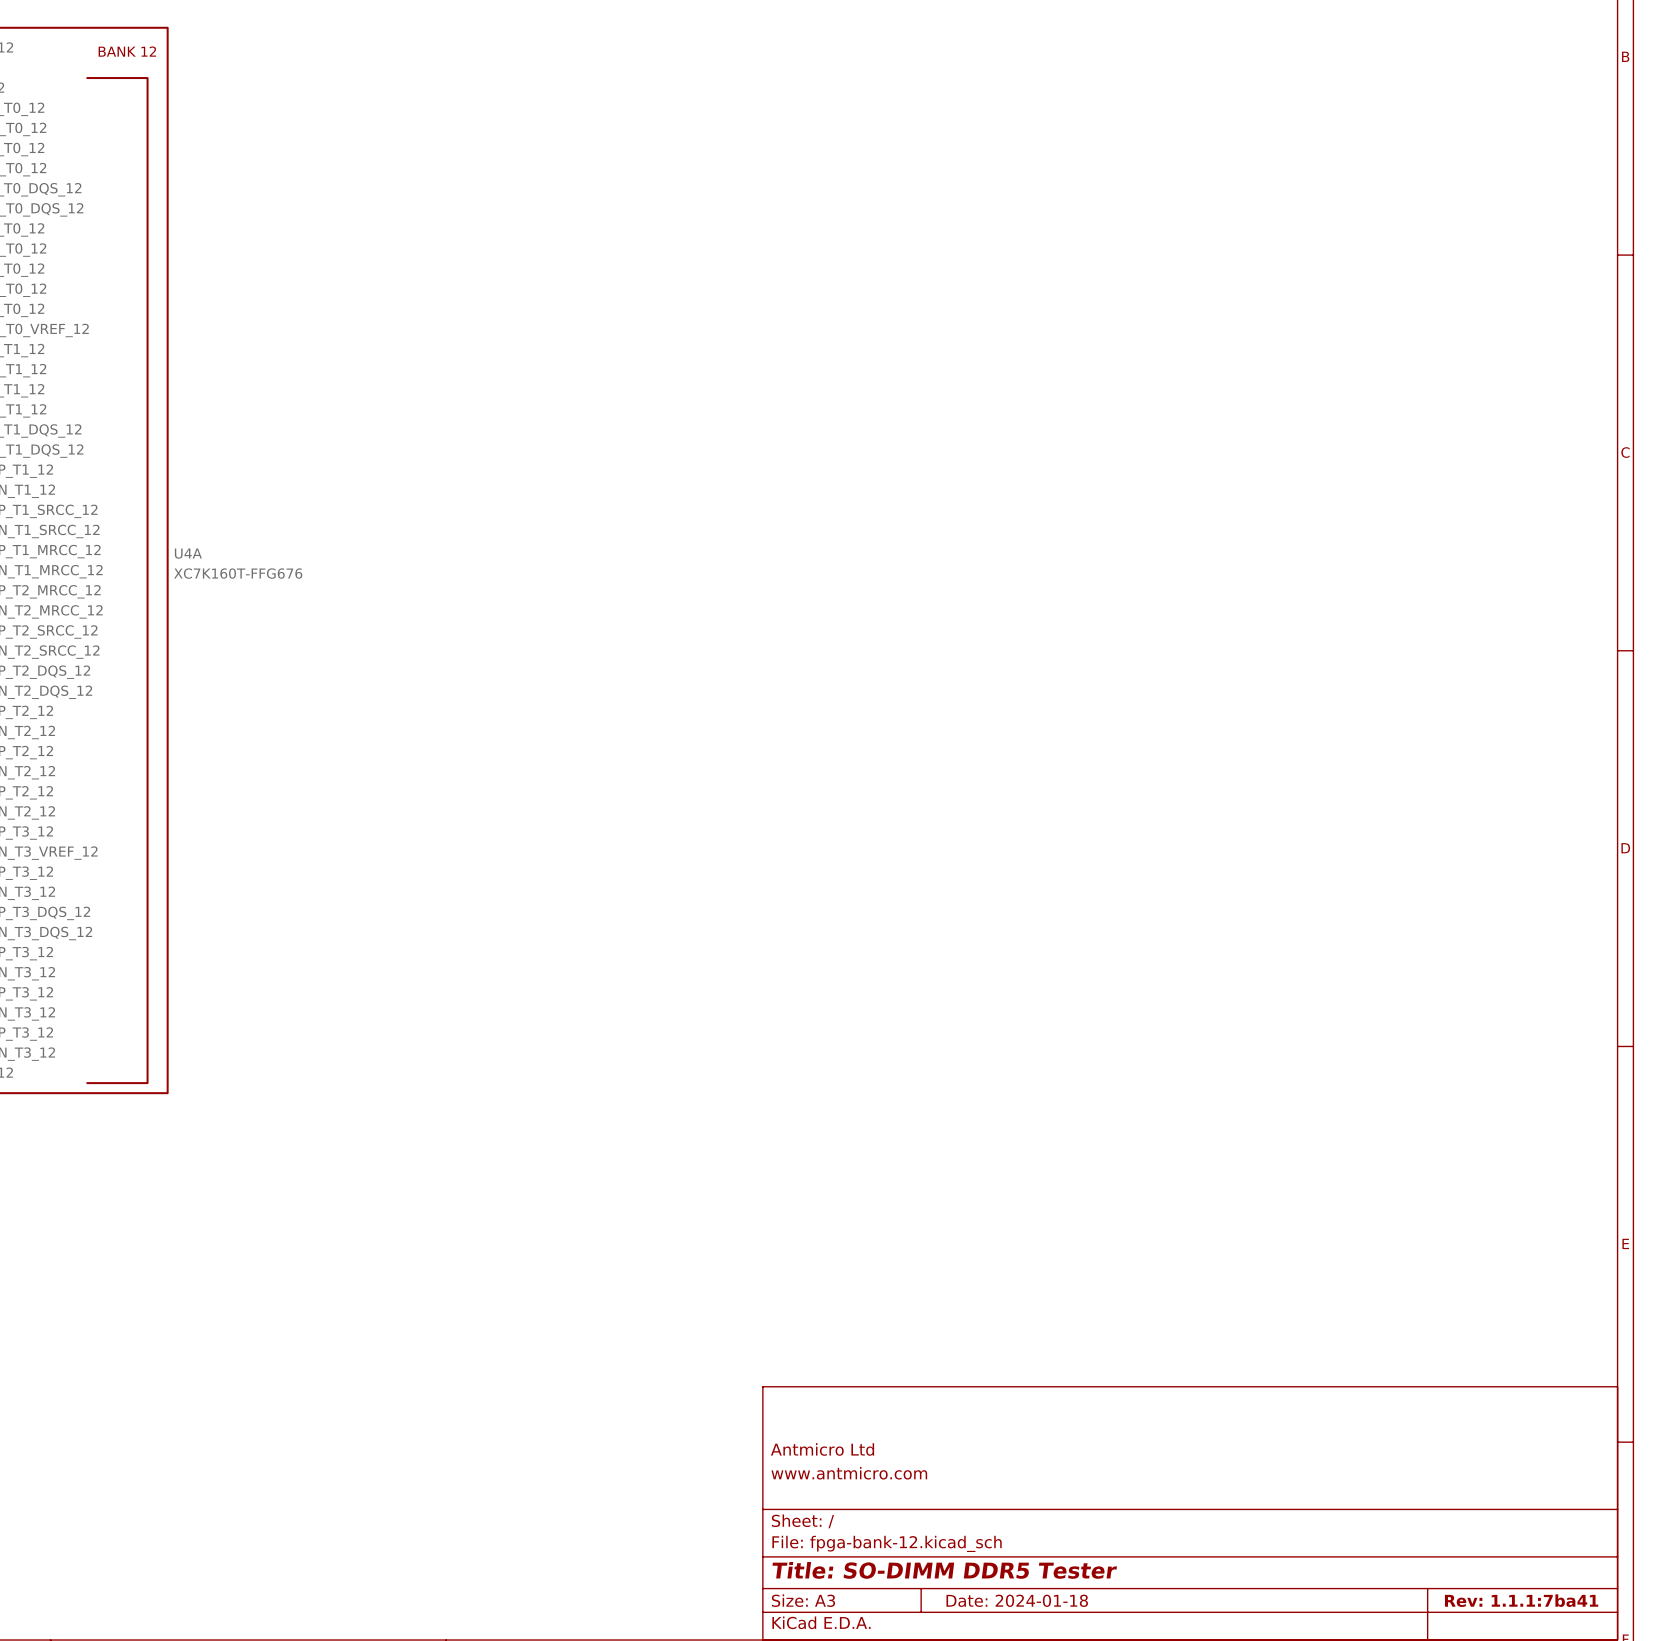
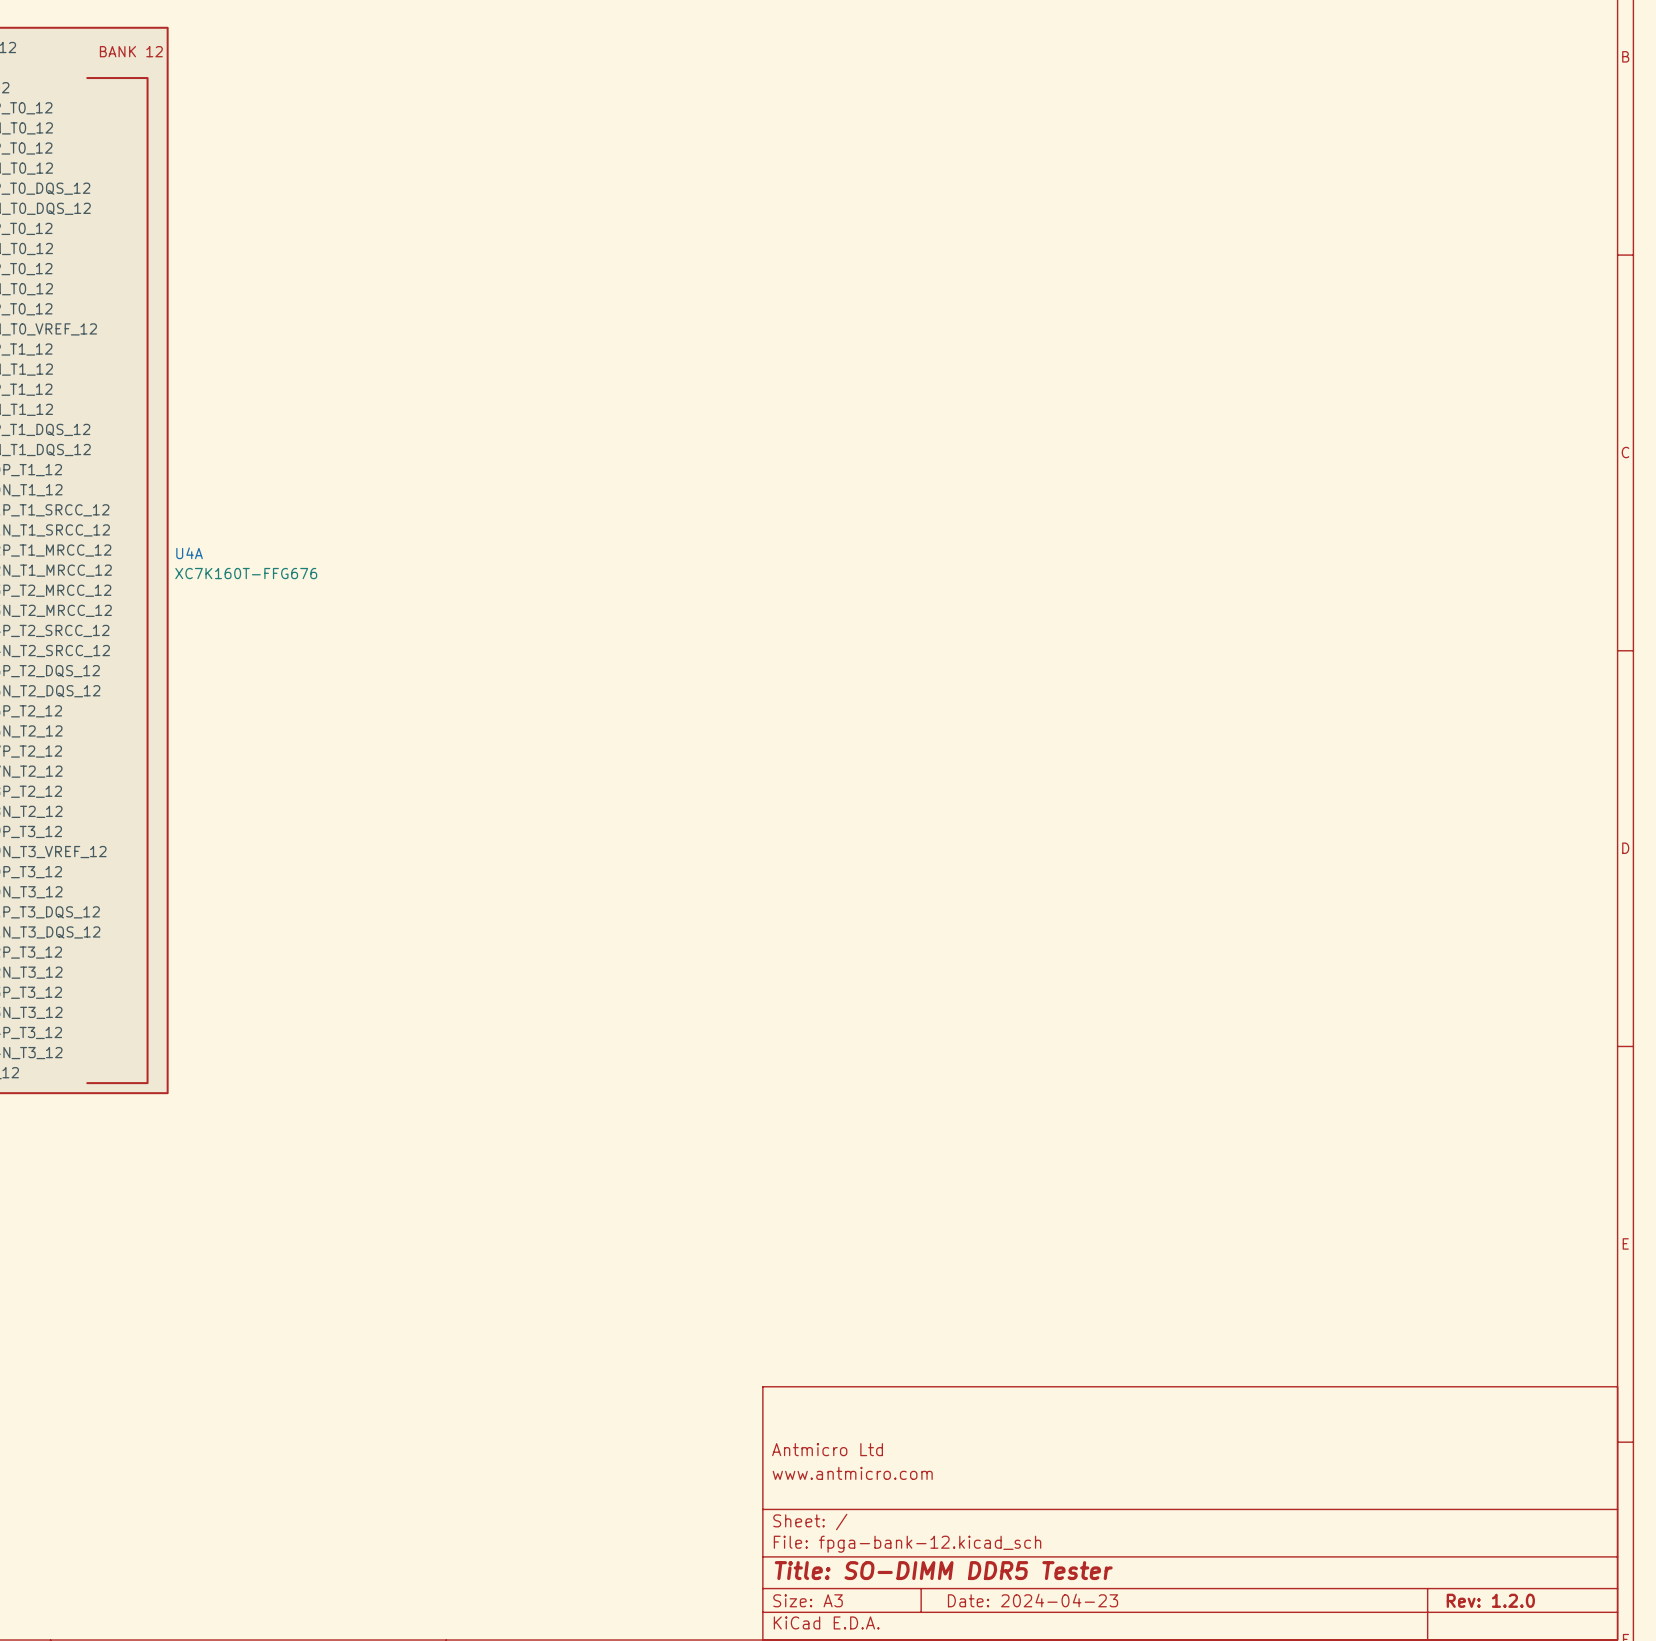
title block: Date: 2024-01-18 (1017, 1600) -> Date: 2024-04-23 (1033, 1600)
title block: Rev: 1.1.1:7ba41 (1521, 1600) -> Rev: 1.2.0 (1490, 1600)

